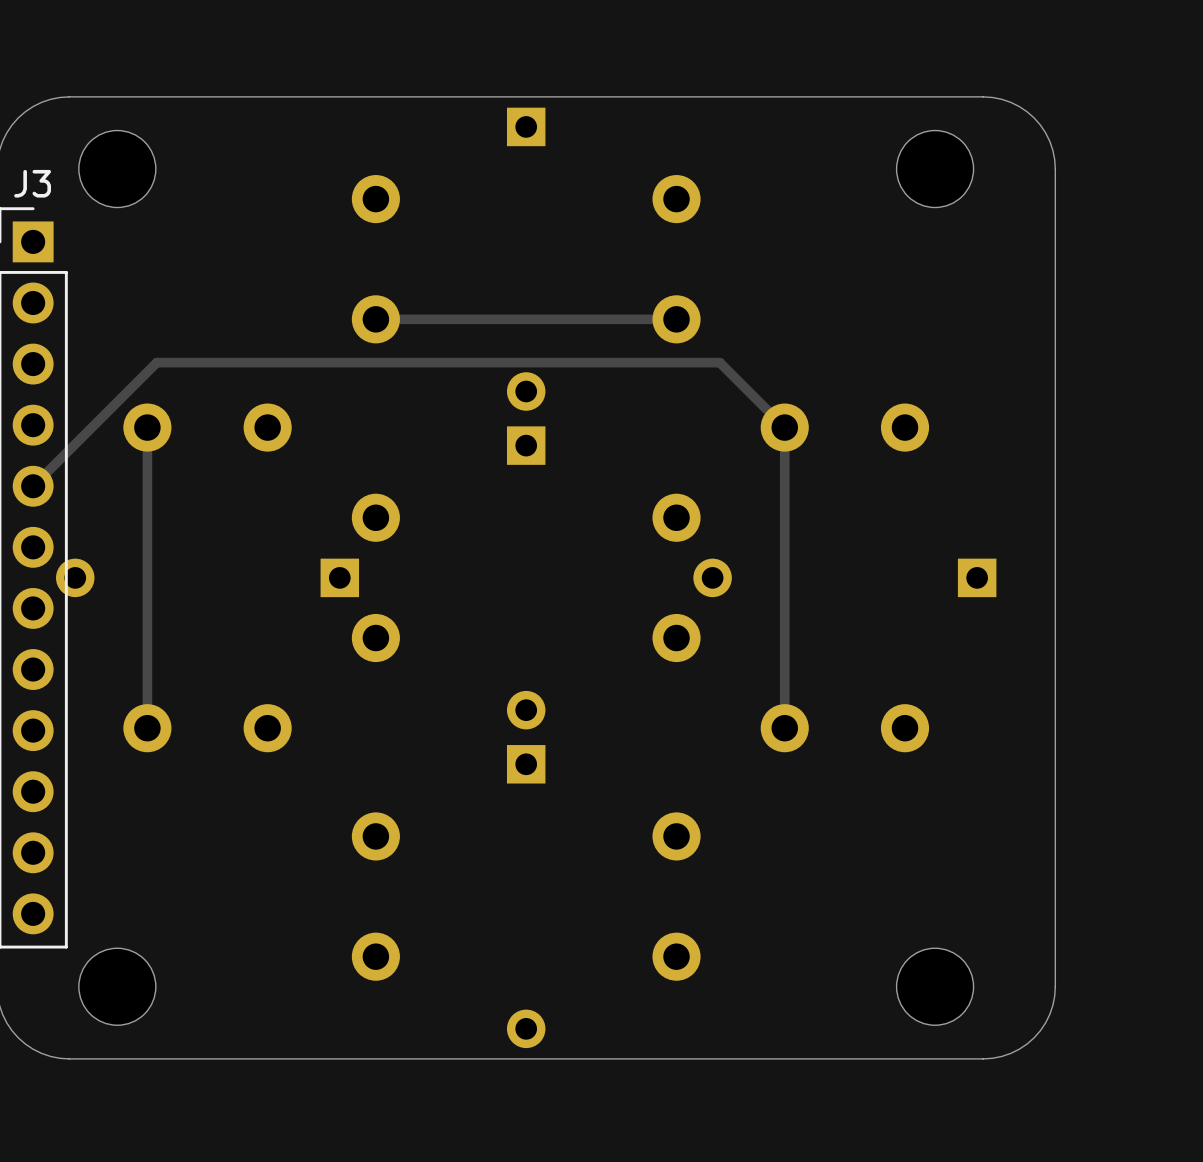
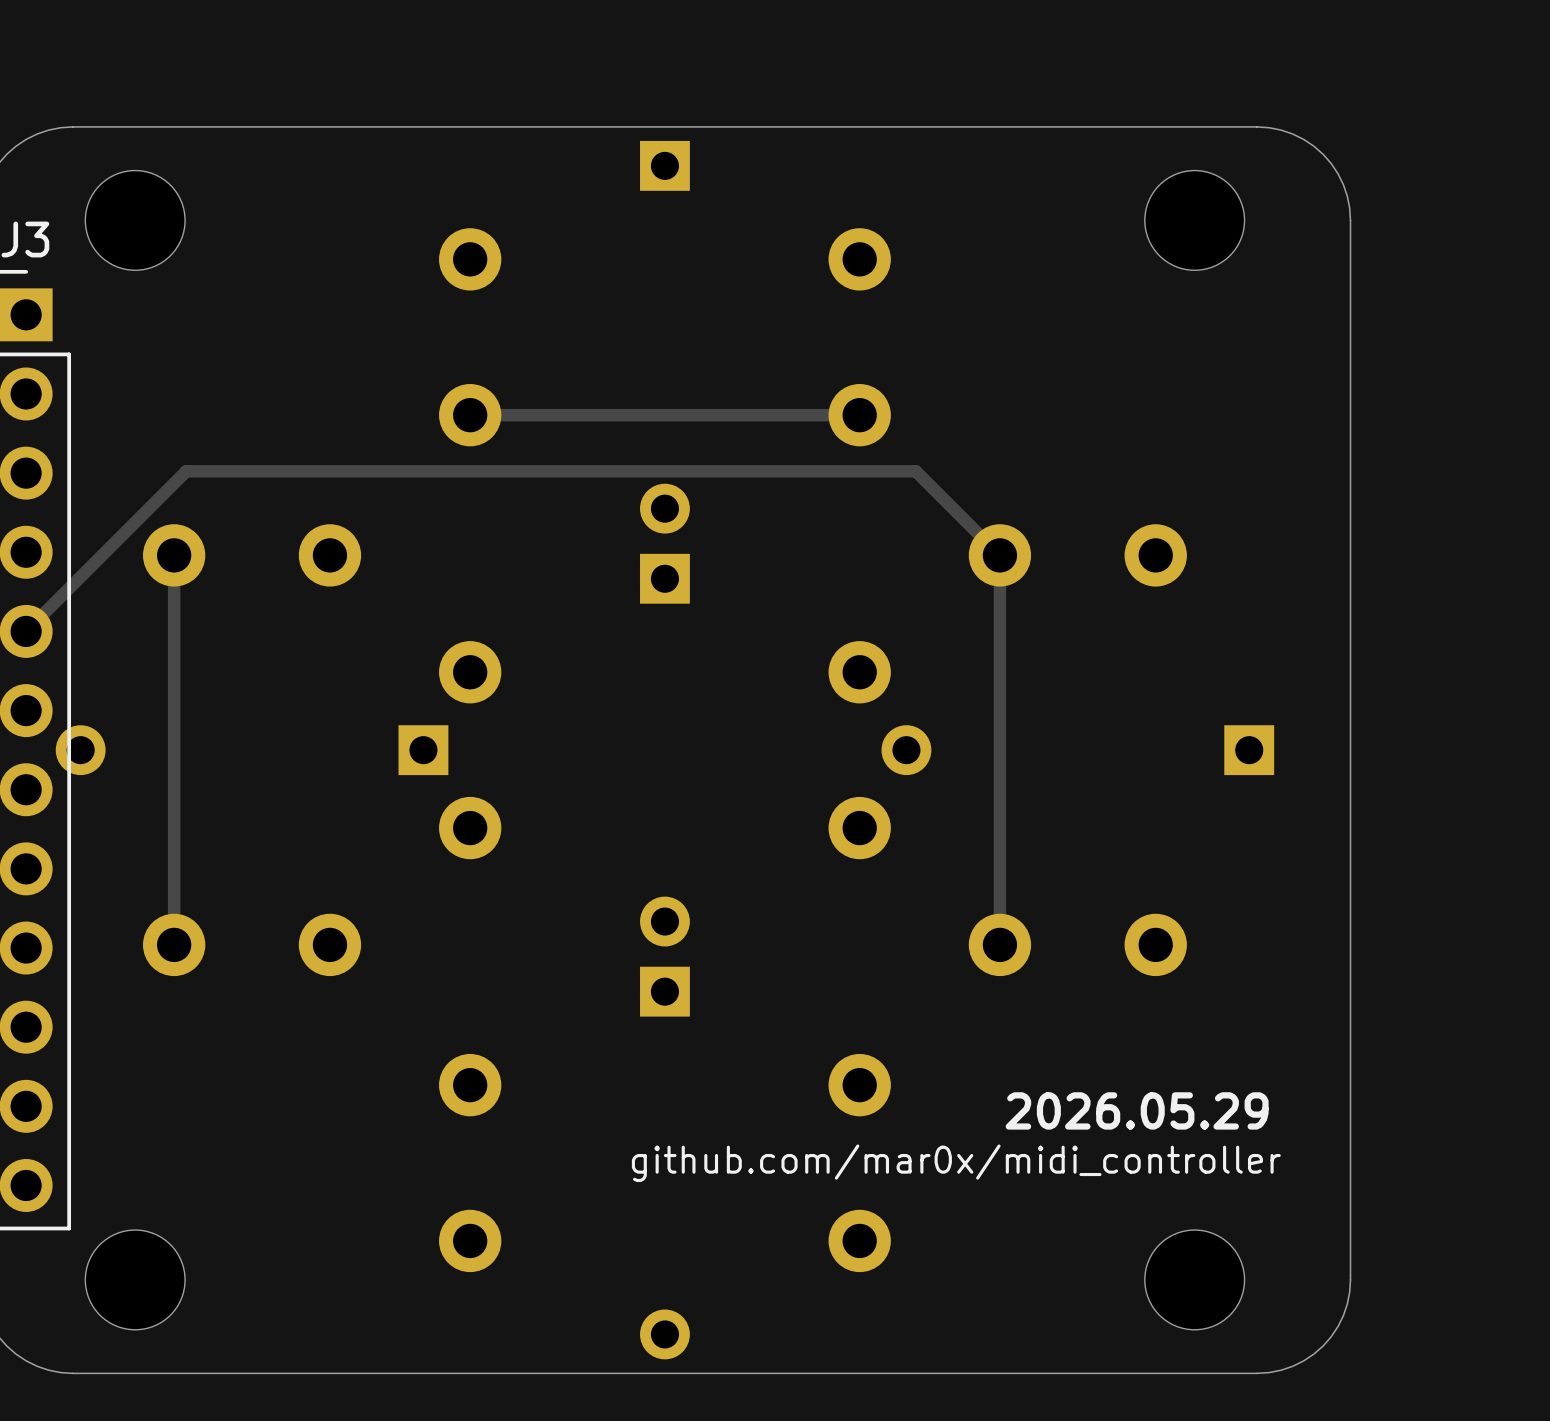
text: none -> 2026.05.29 (1137, 1110)
text: none -> github.com/mar0x/midi_controller (956, 1163)

